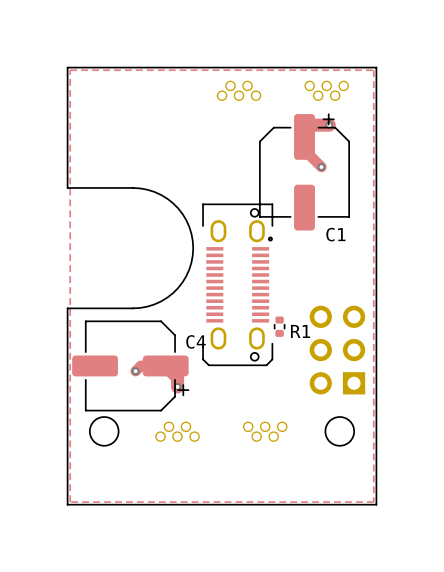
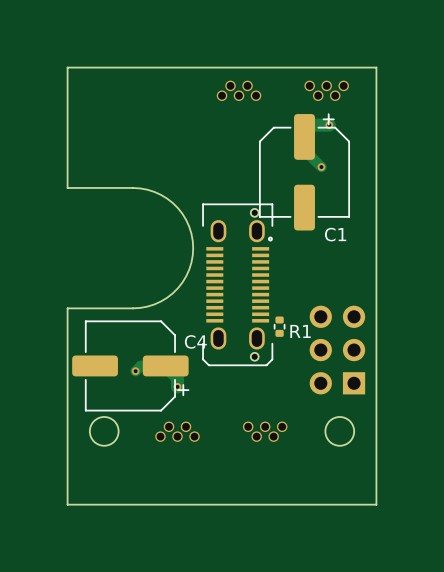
zone outline: (70, 70) (373, 70) (373, 502) (70, 502) (70, 70) -> none

